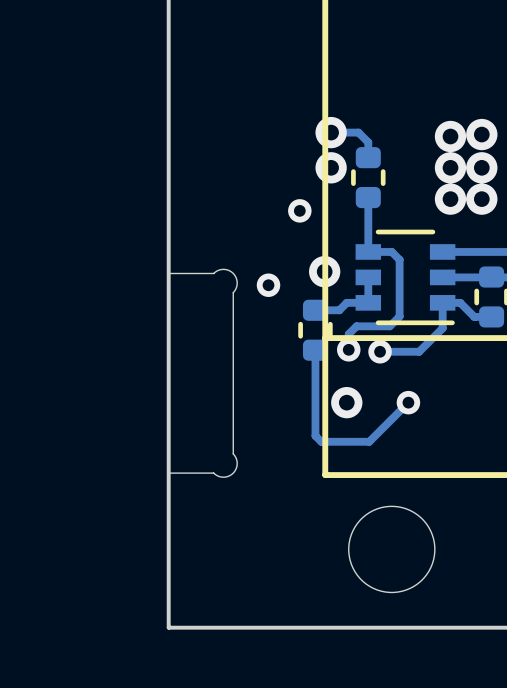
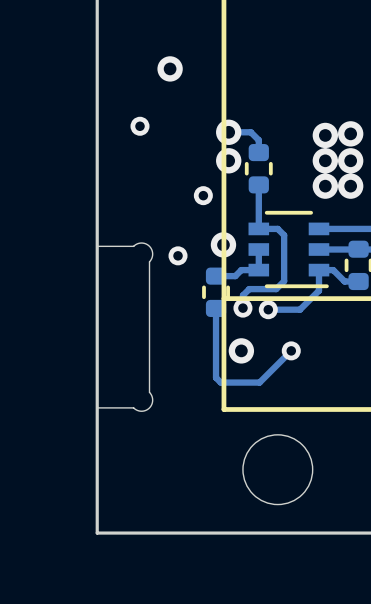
via: none -> (170, 68)
via: none -> (140, 126)

